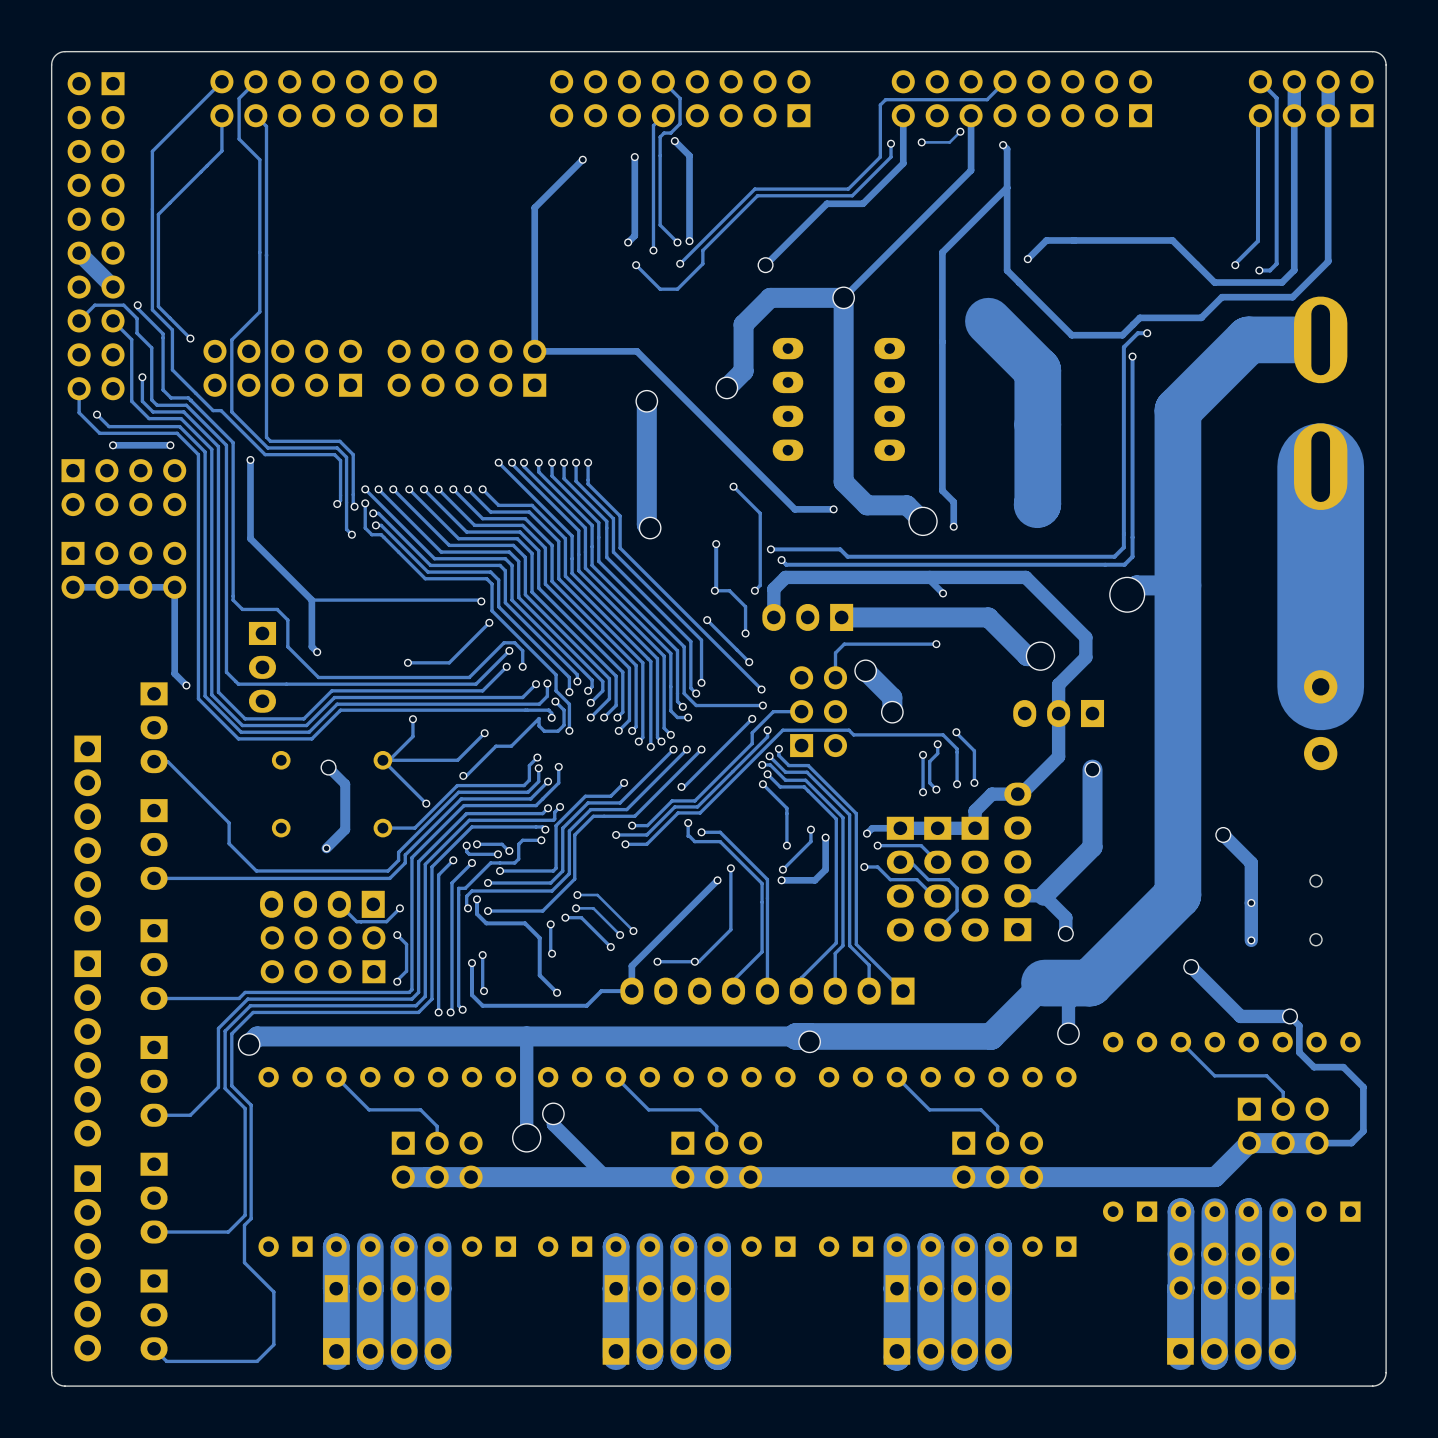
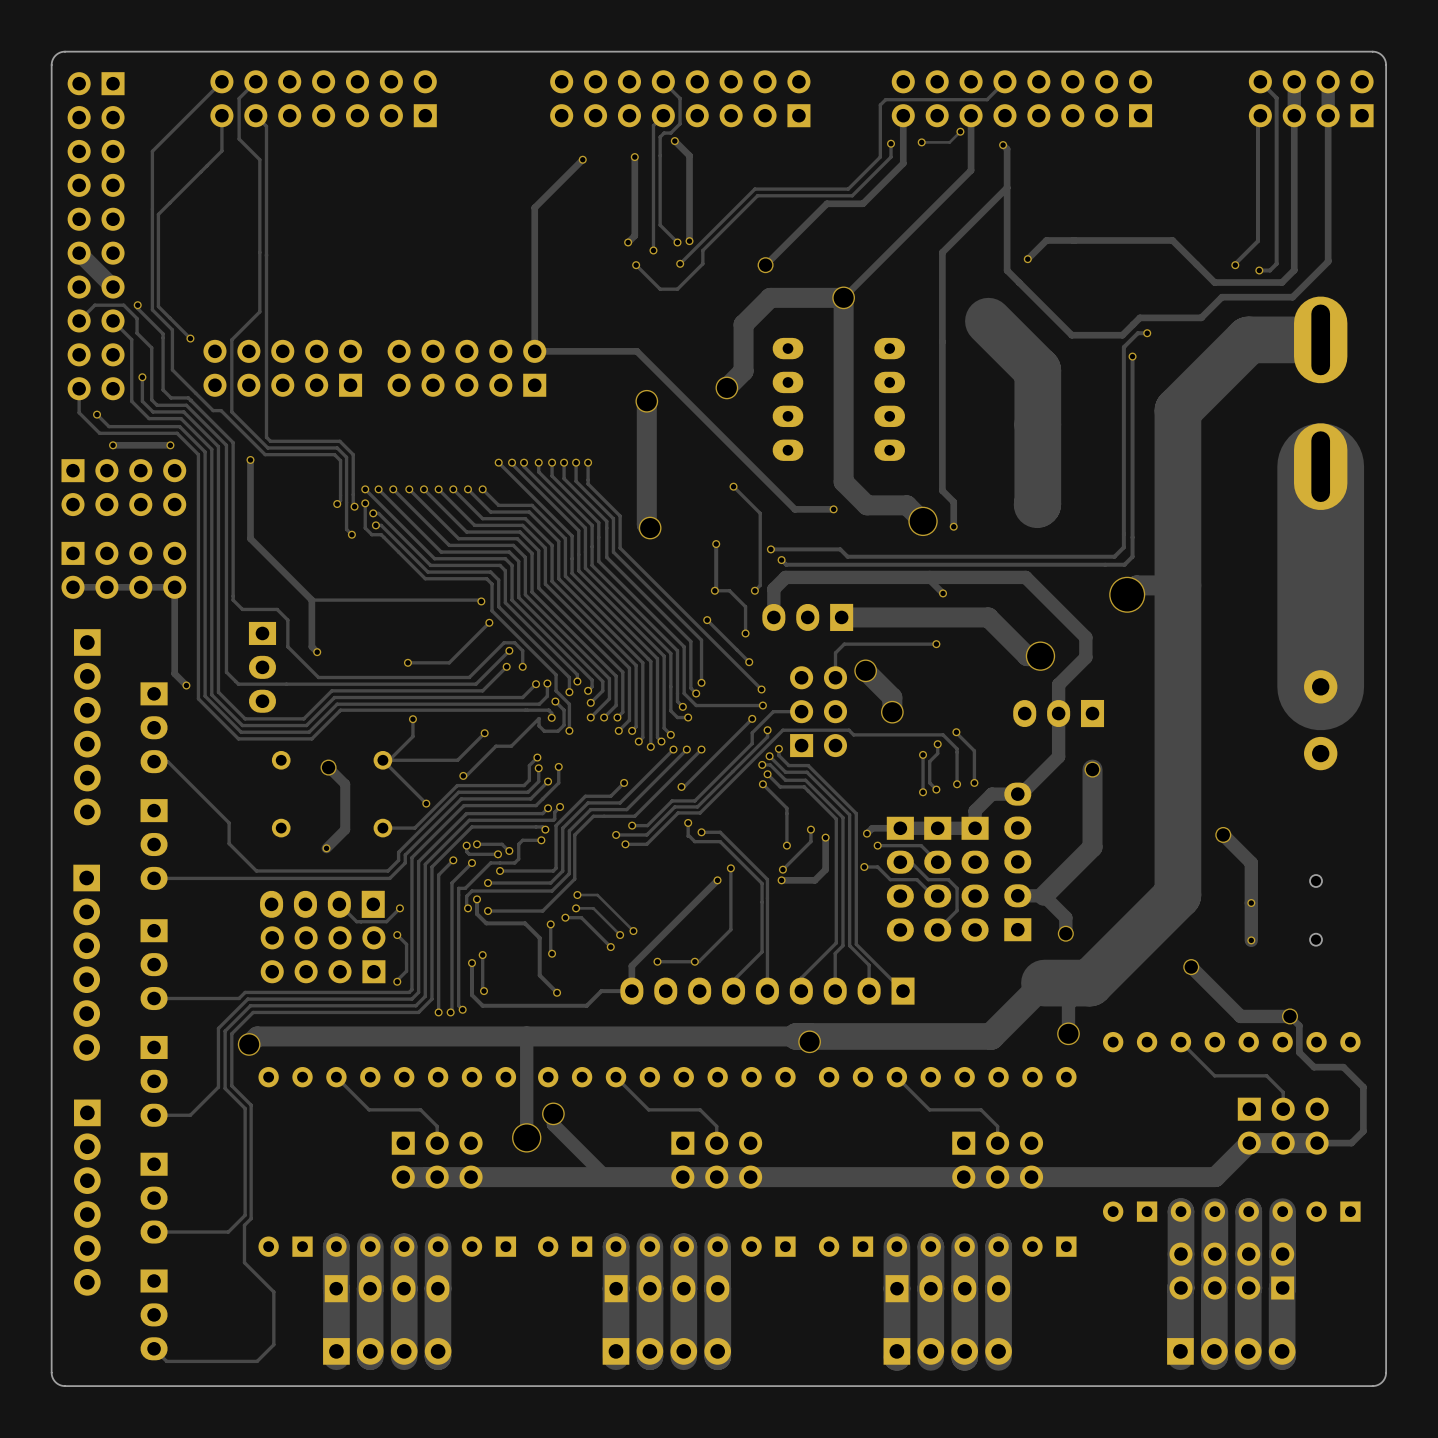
part: none -> (87, 727)
part: (87, 833) -> none
part: none -> (86, 962)
part: (87, 1048) -> none
part position: (87, 1263) -> (87, 1197)

